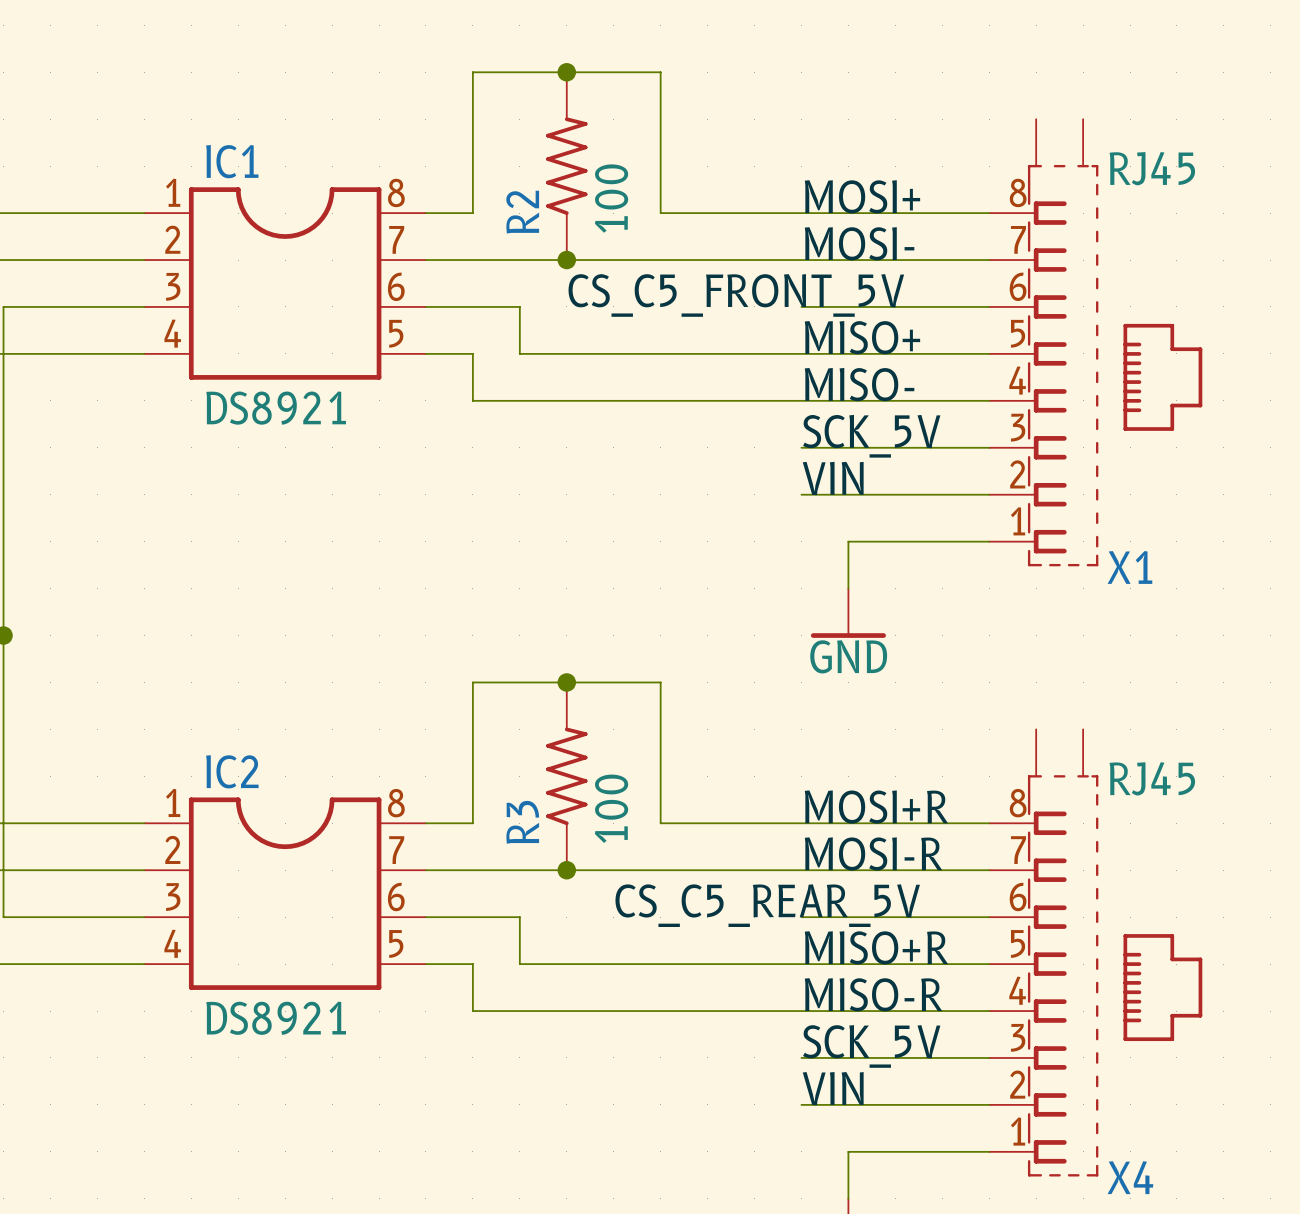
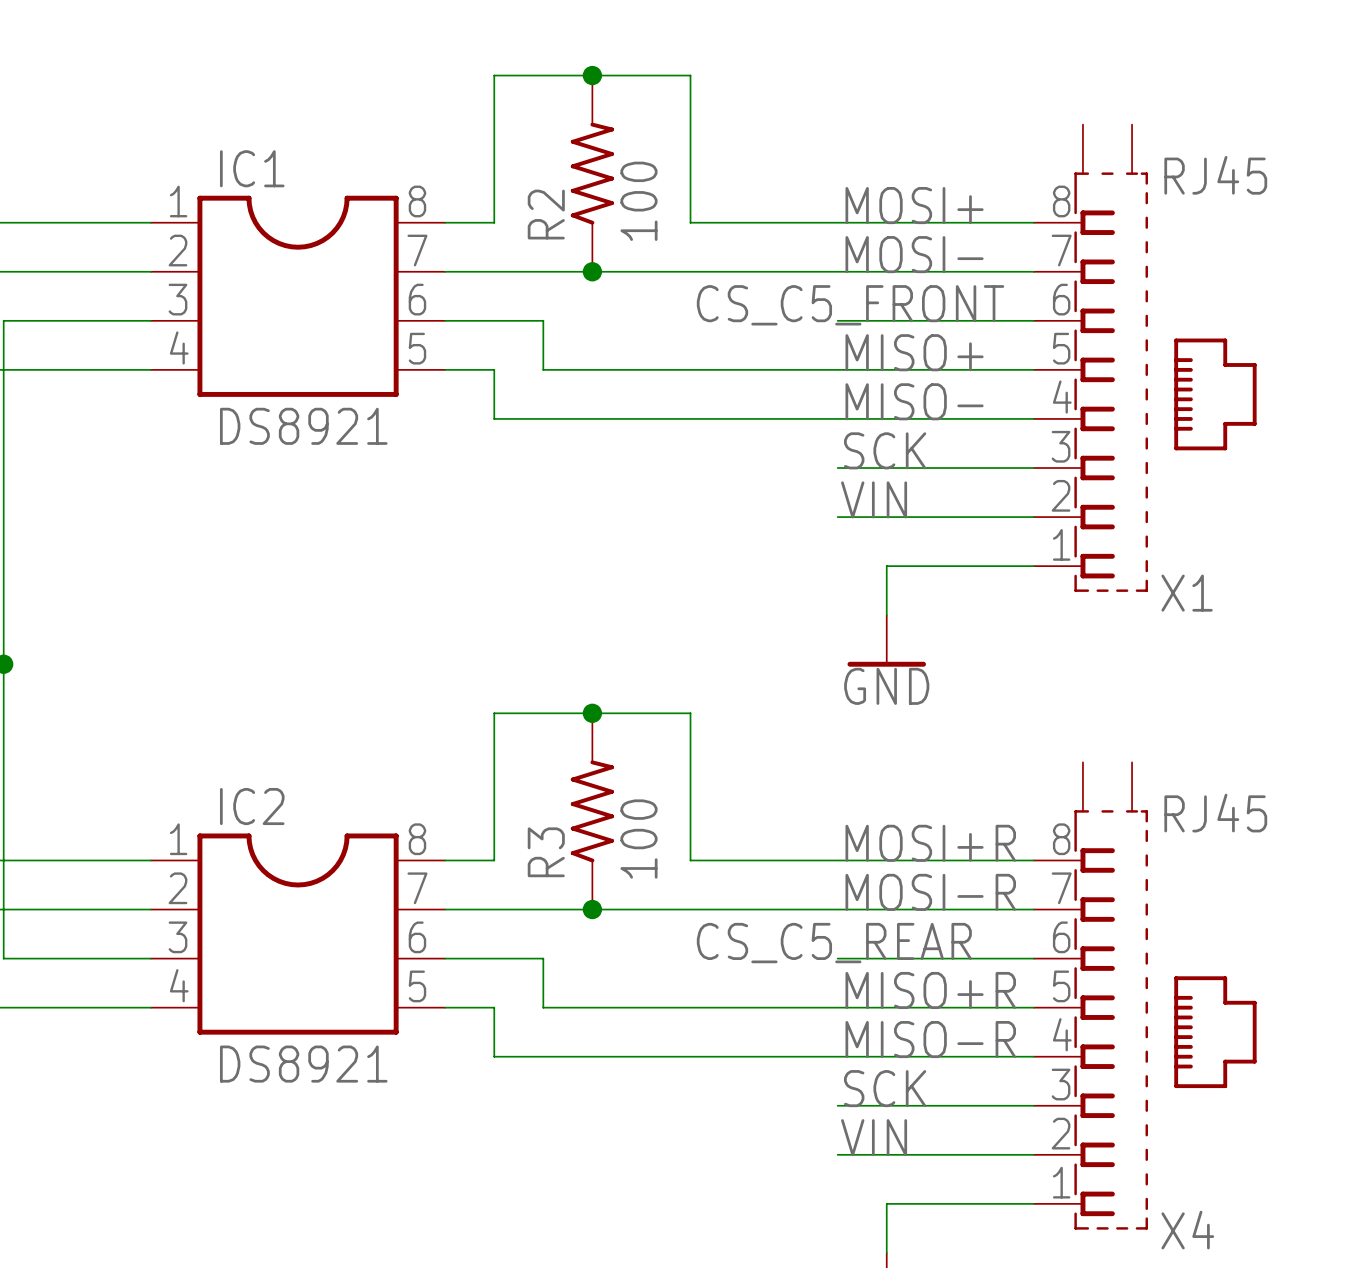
label: CS_C5_FRONT_5V (736, 295) -> CS_C5_FRONT (850, 305)
label: SCK_5V (871, 436) -> SCK (885, 450)
label: CS_C5_REAR_5V (767, 905) -> CS_C5_REAR (834, 943)
label: SCK_5V (871, 1046) -> SCK (885, 1088)

